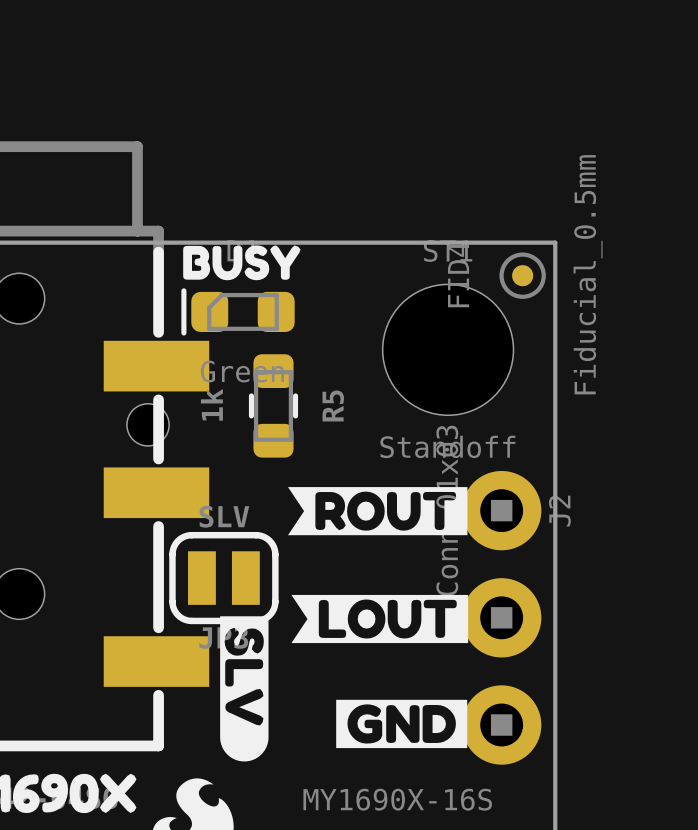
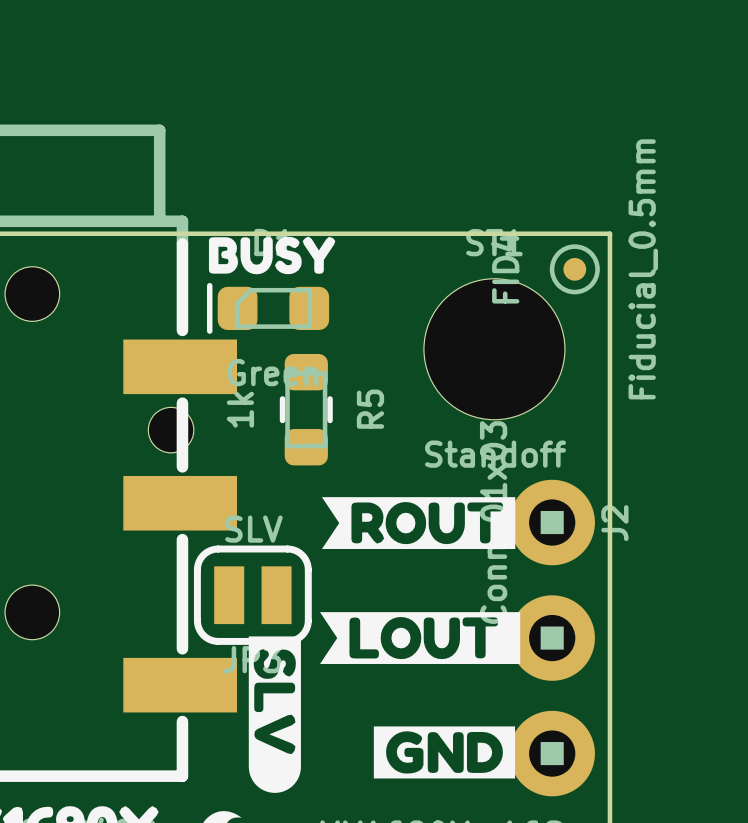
drawing shape: [291, 594, 469, 644] -> [319, 612, 521, 664]

